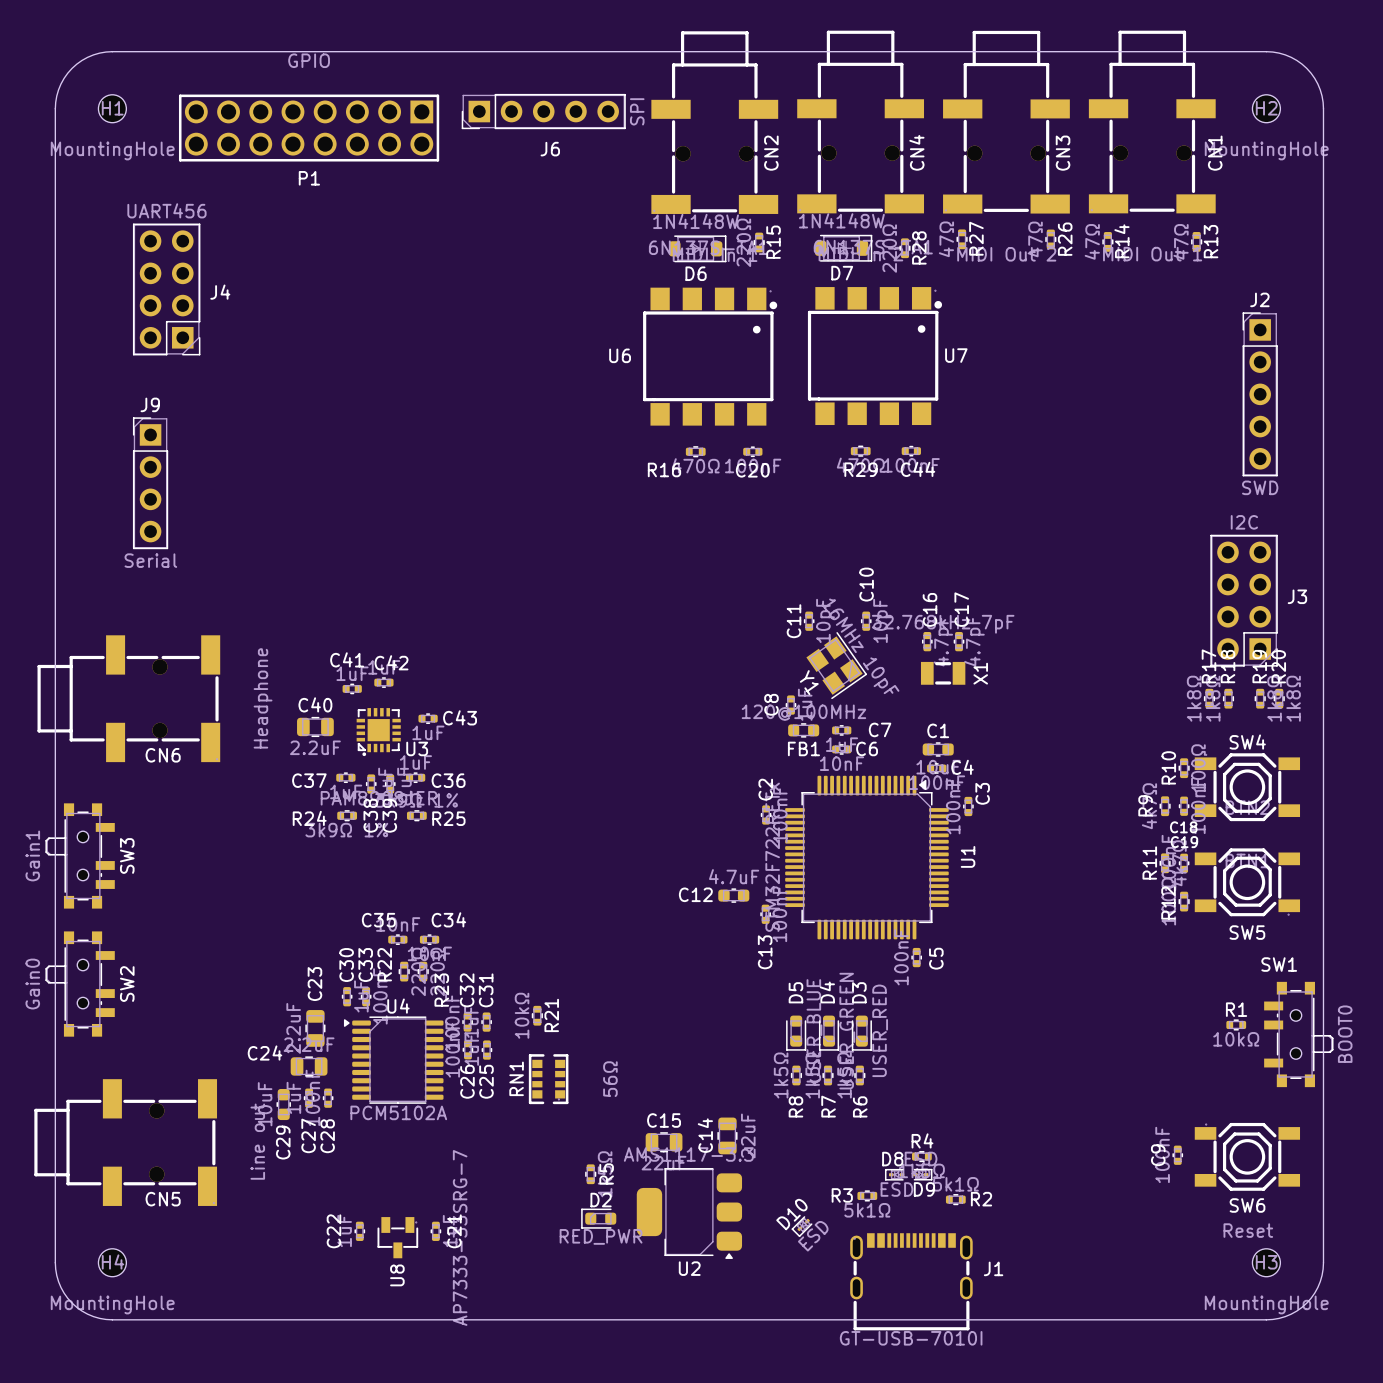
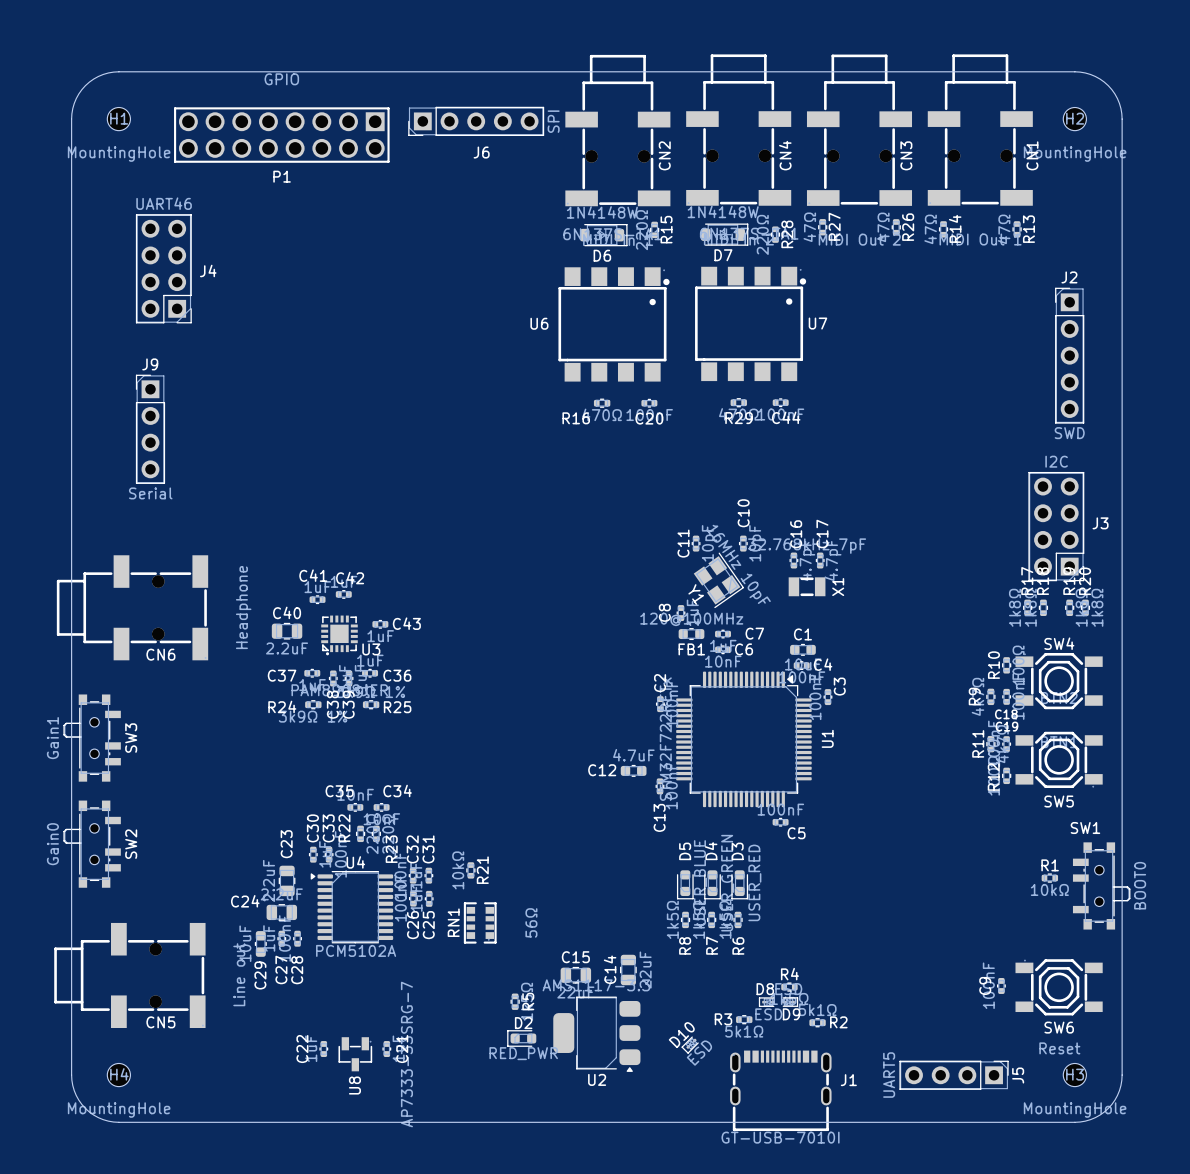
J4 value: UART456 (166, 210) -> UART46 (164, 203)
C5 rotation: 0° (916, 957) -> 90° clockwise (780, 822)
J5: none -> UART5 (954, 1075)

